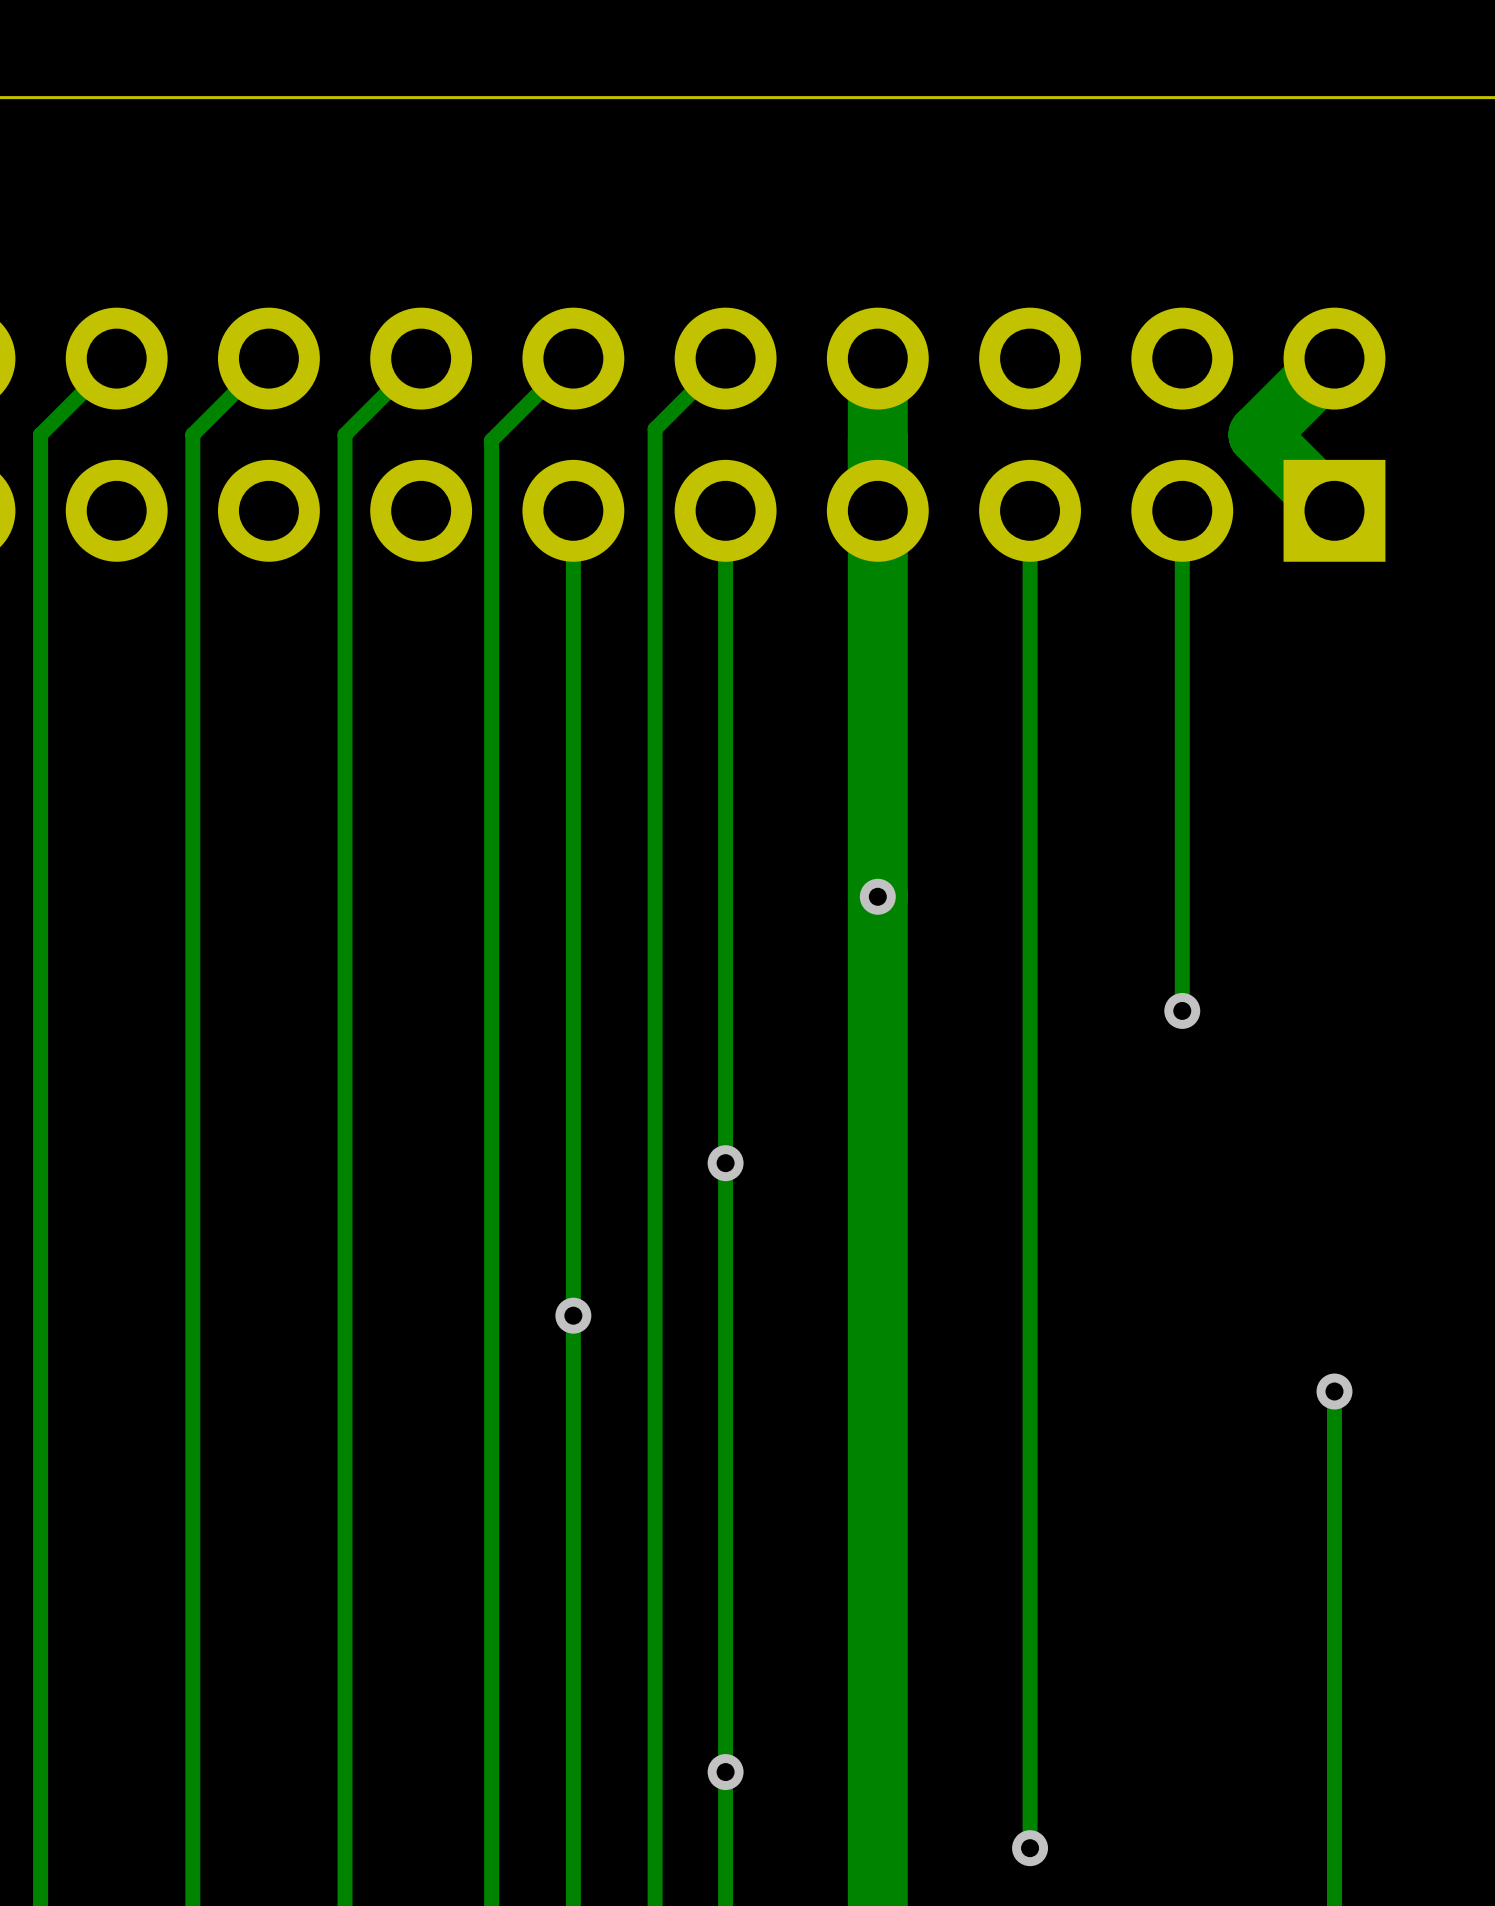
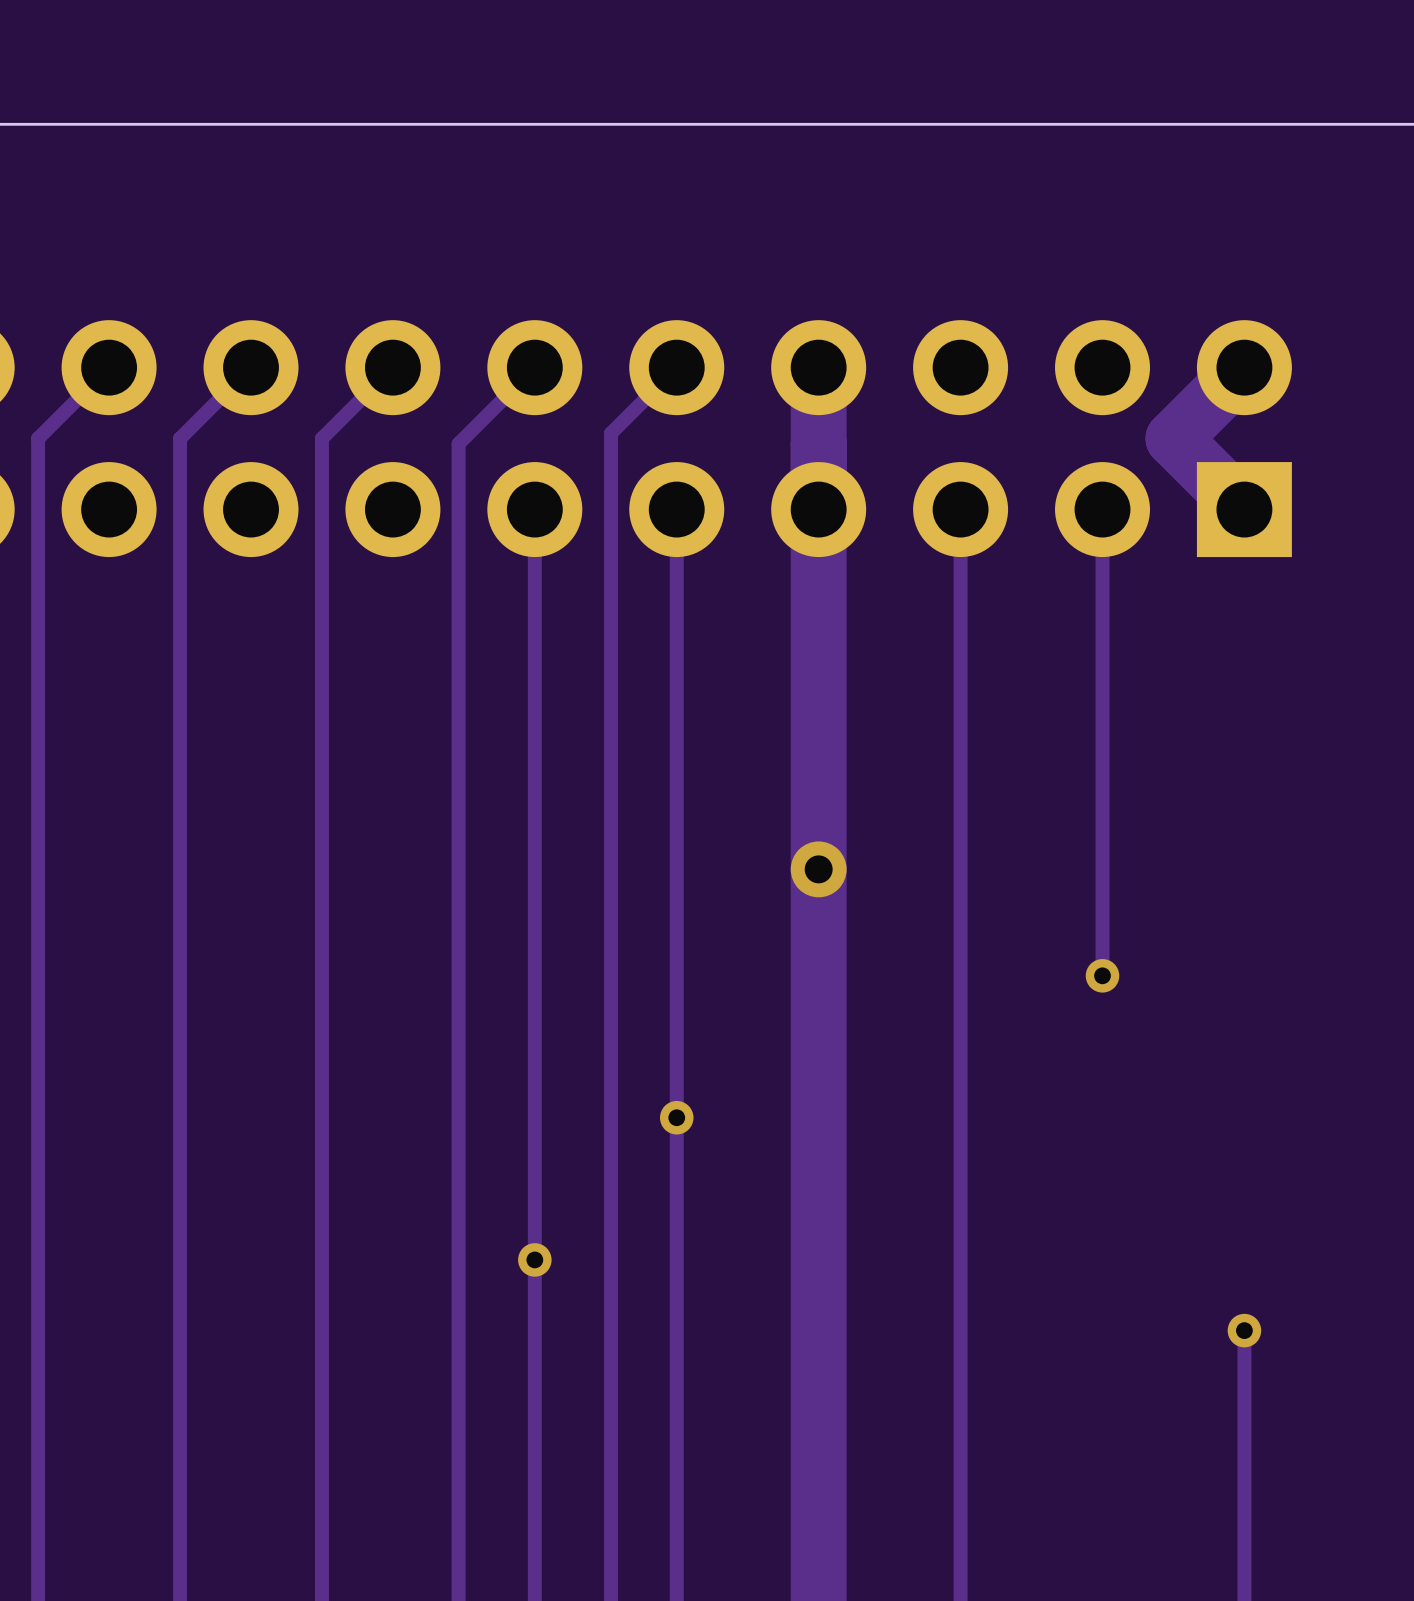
via size: [859, 878, 896, 915] -> [790, 841, 847, 898]

